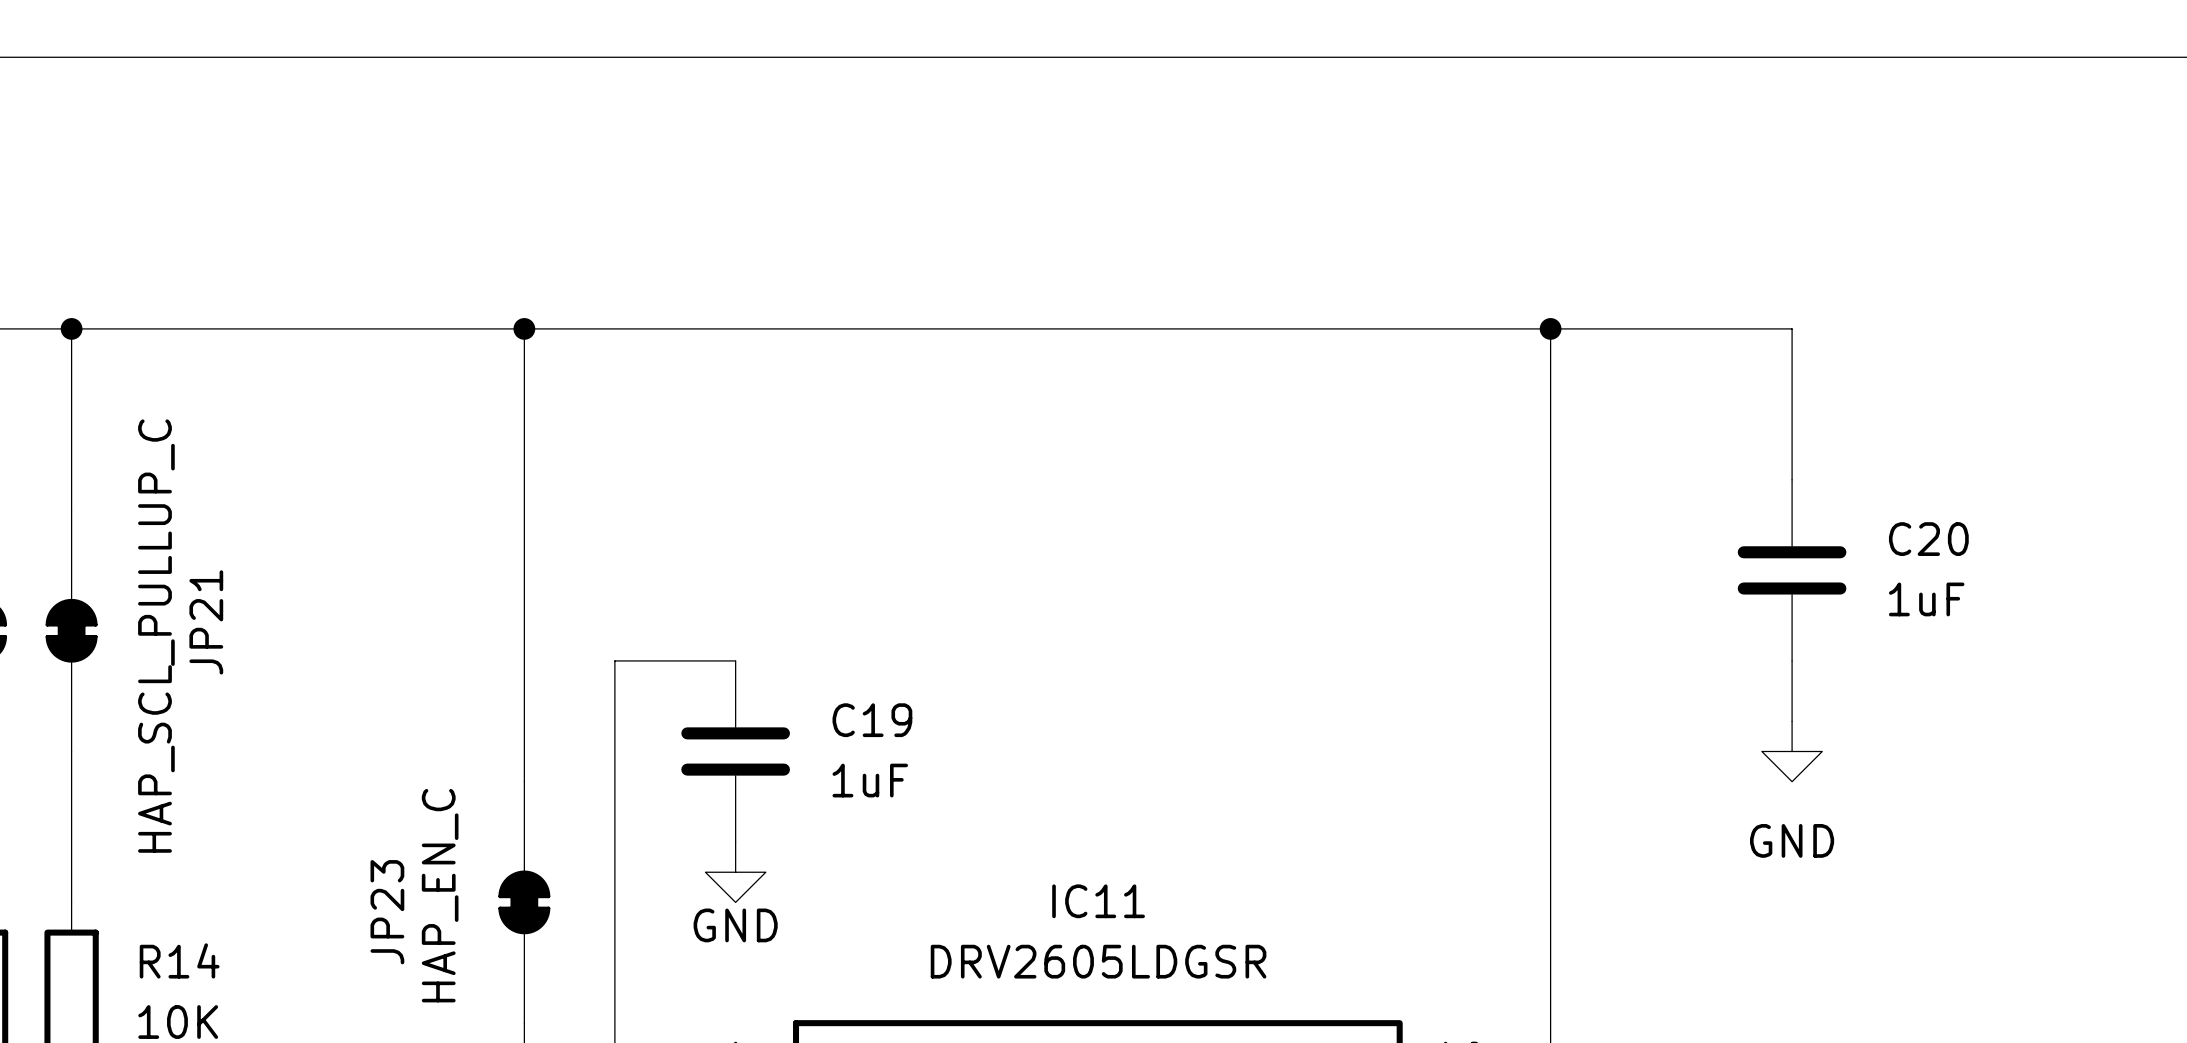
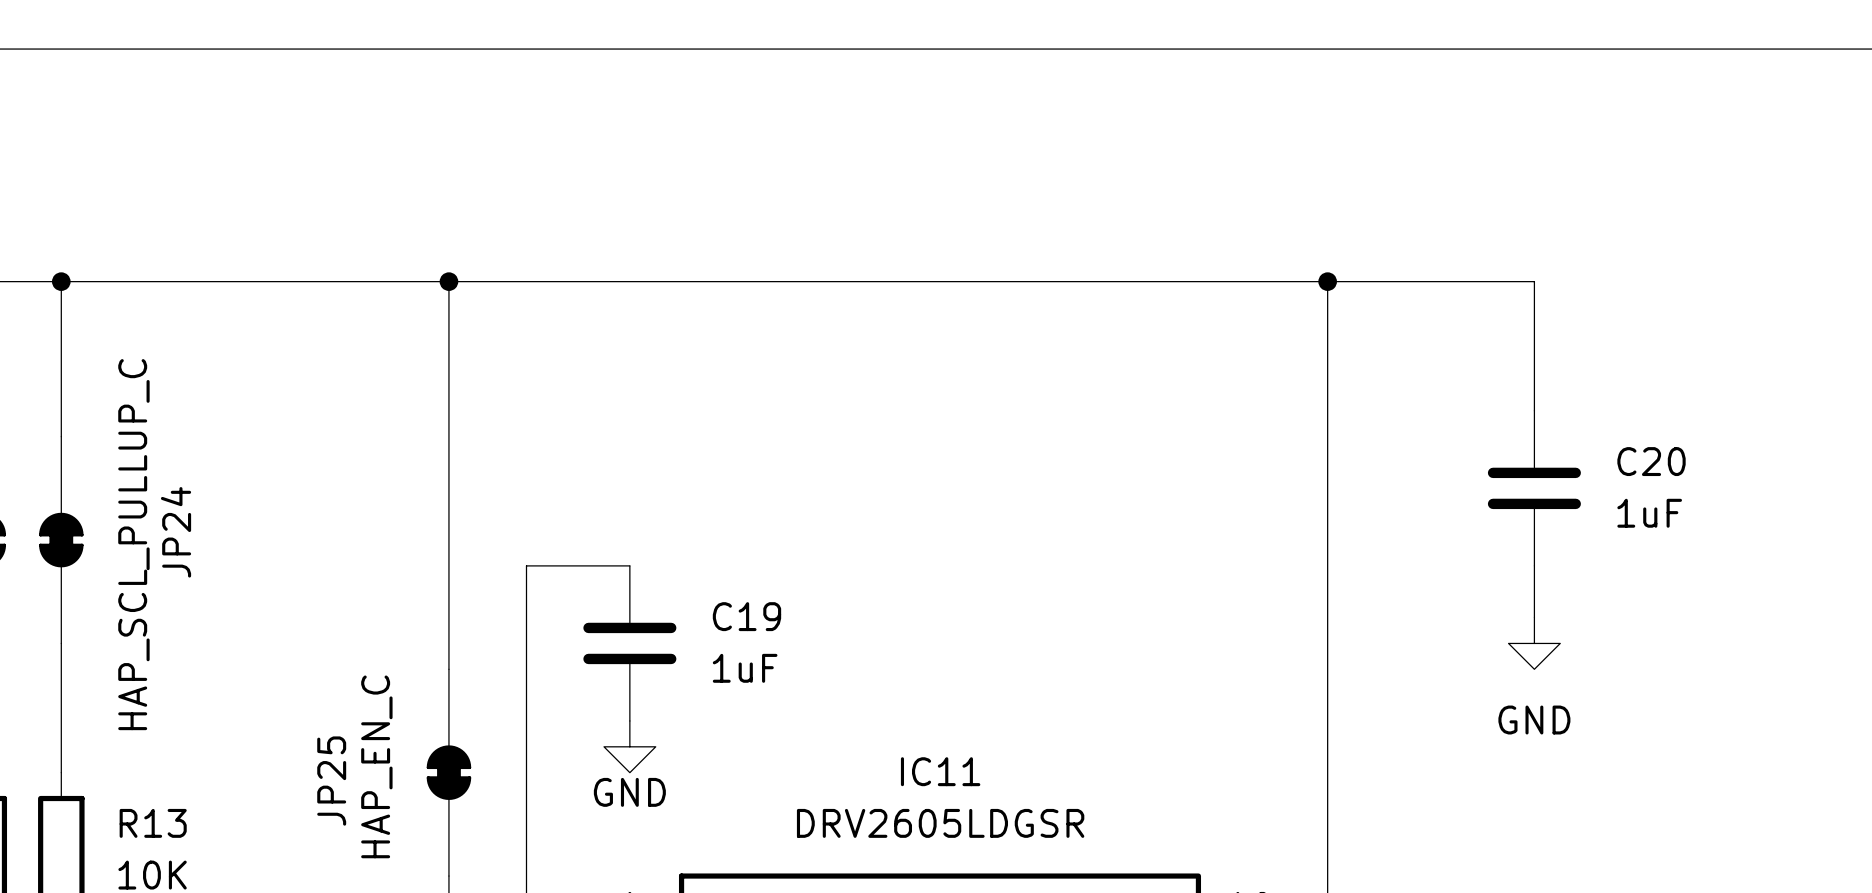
JP21 name: JP21 (206, 622) -> JP24 (176, 532)
JP23 name: JP23 (387, 912) -> JP25 (331, 781)
R14 name: R14 (179, 960) -> R13 (153, 823)

